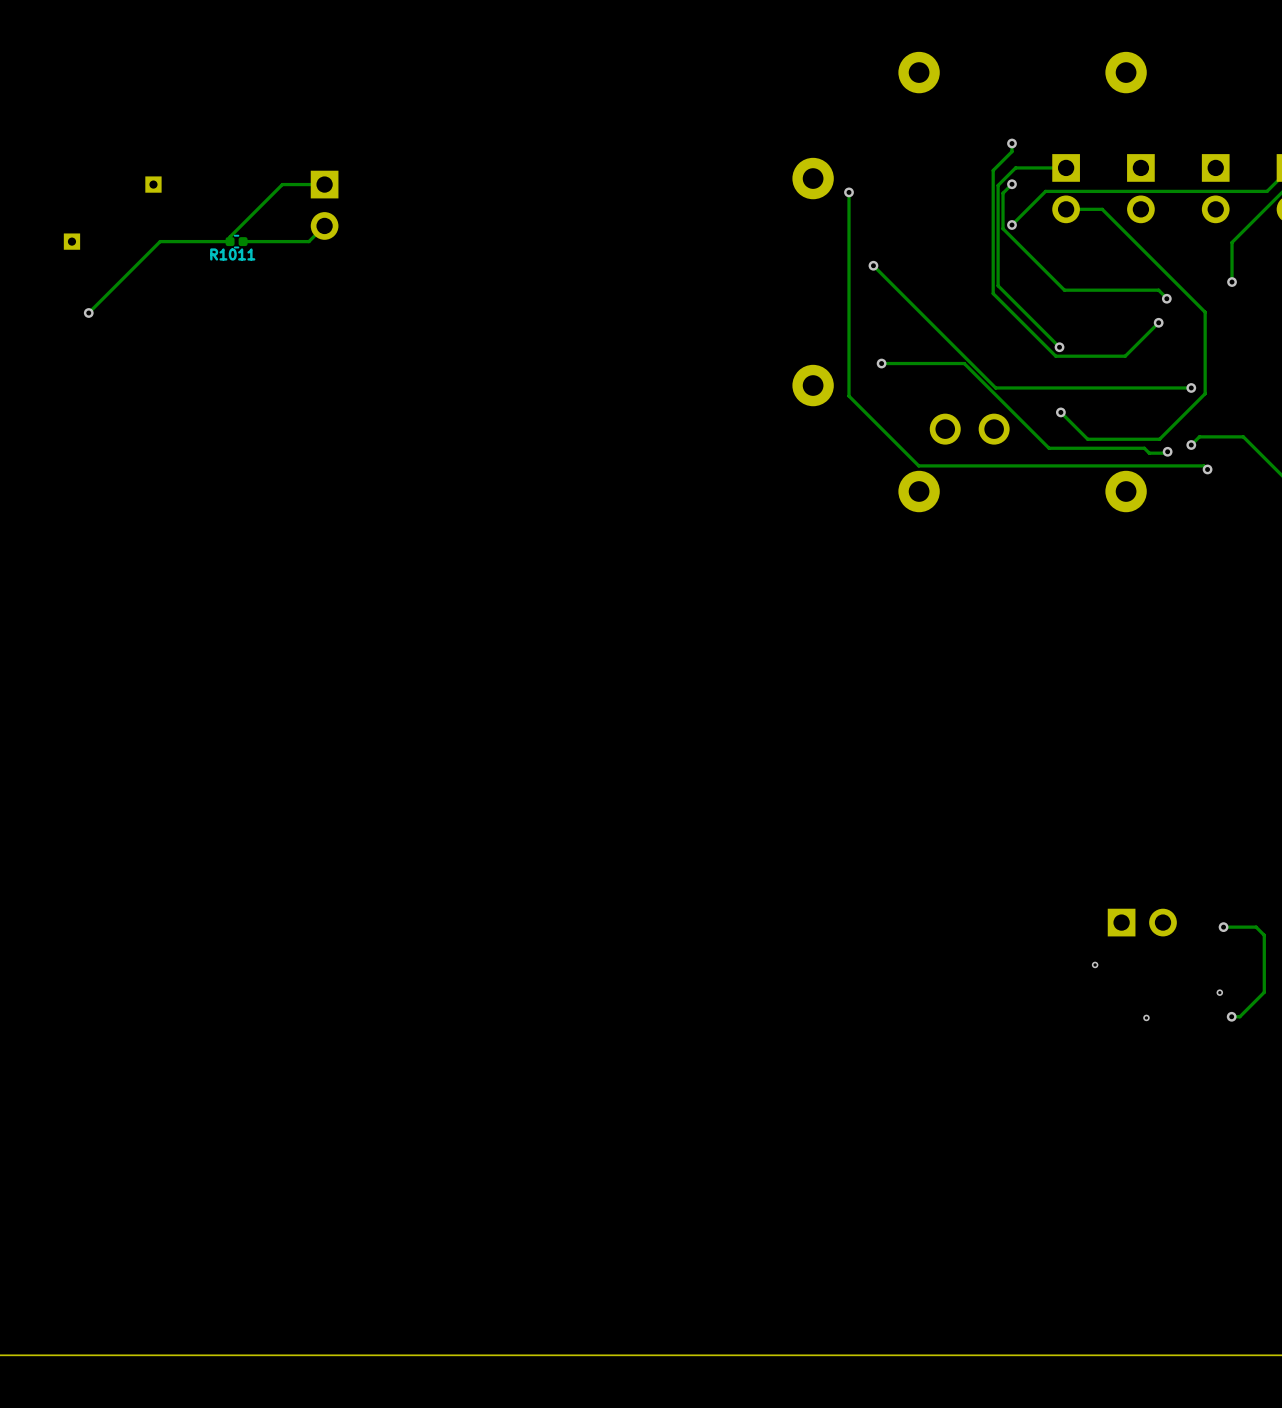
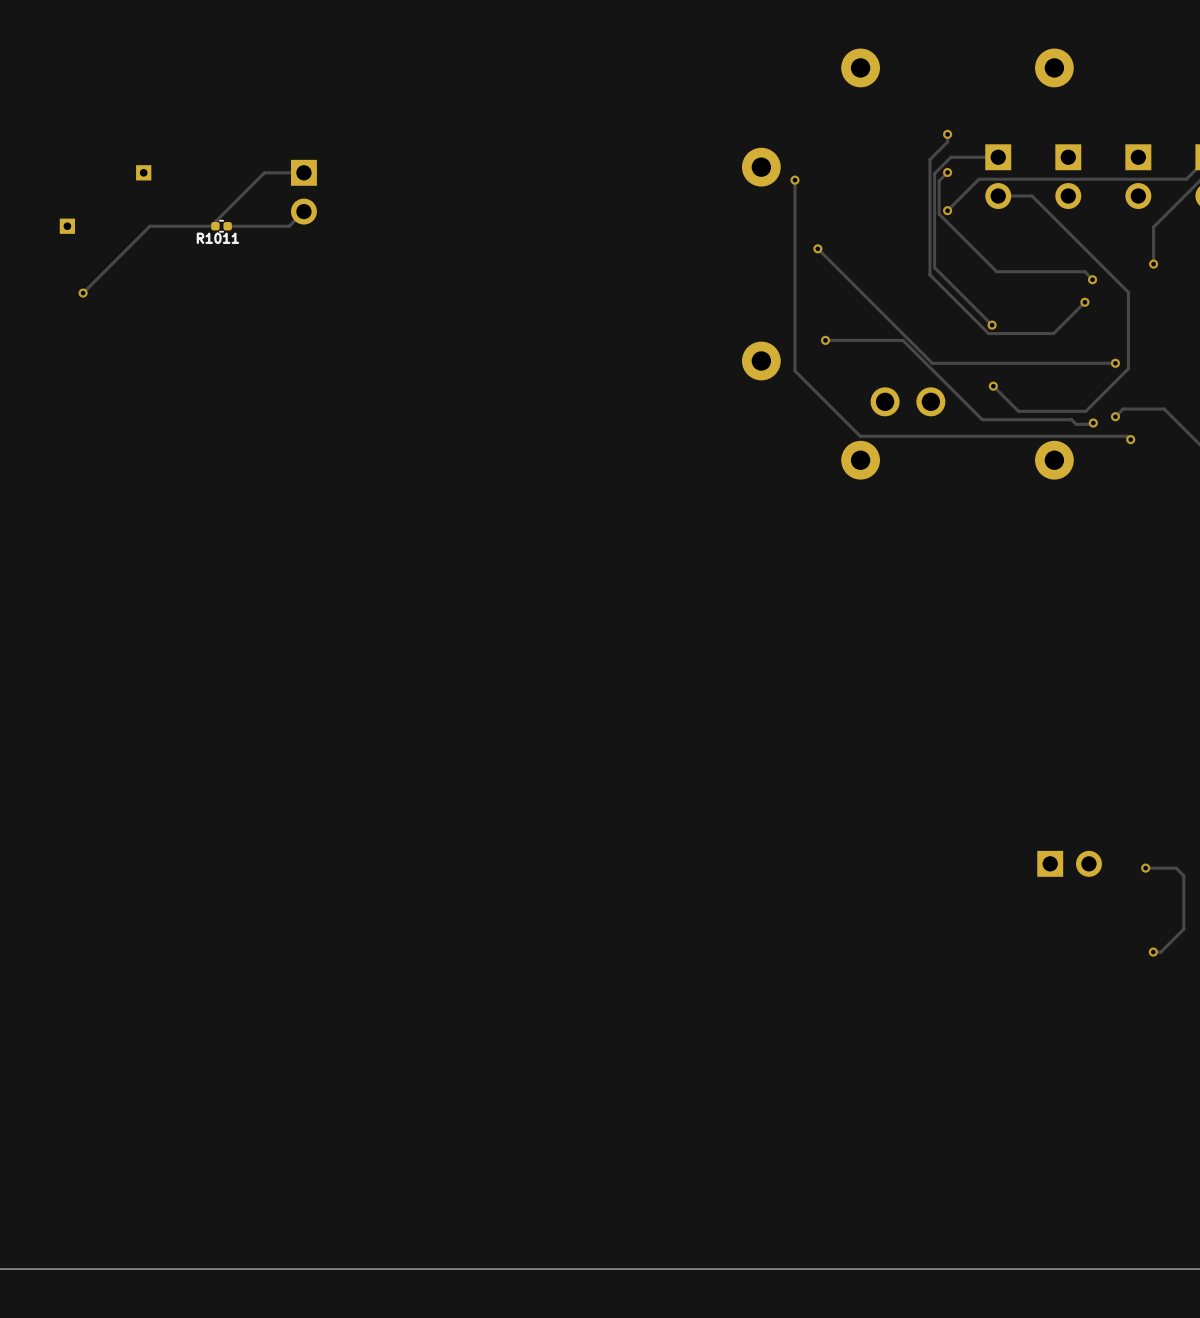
via: (1095, 964) -> none
via: (1219, 992) -> none
via: (1146, 1017) -> none

